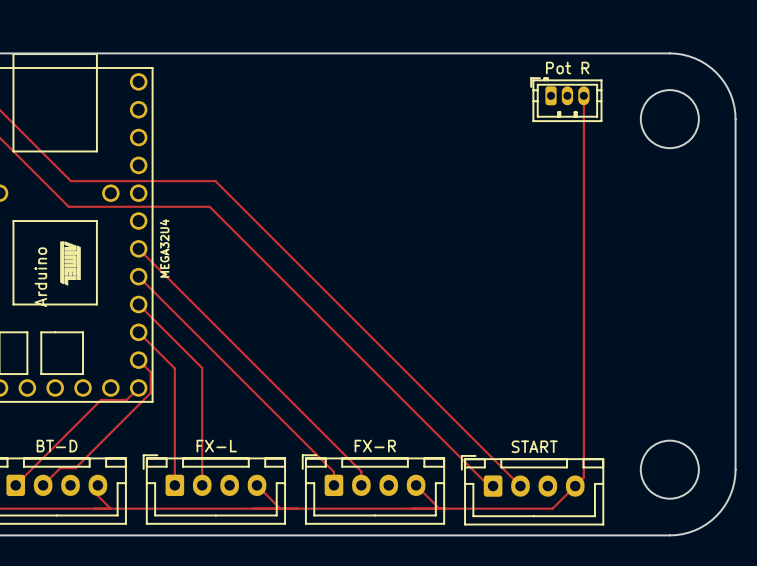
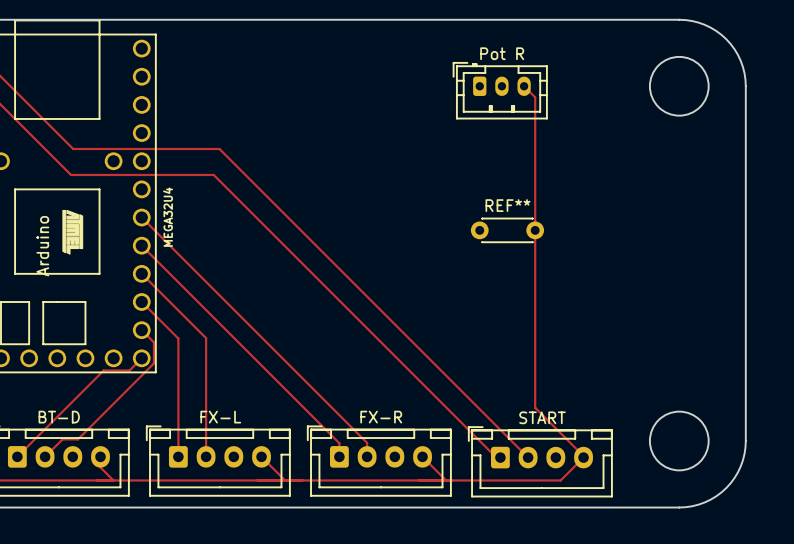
track: (583, 95) (583, 477) (575, 486) -> (524, 86) (535, 97) (535, 407) (583, 457)
Pot R: (566, 99) -> none
Pot R: none -> (500, 90)
REF**: none -> (507, 230)

